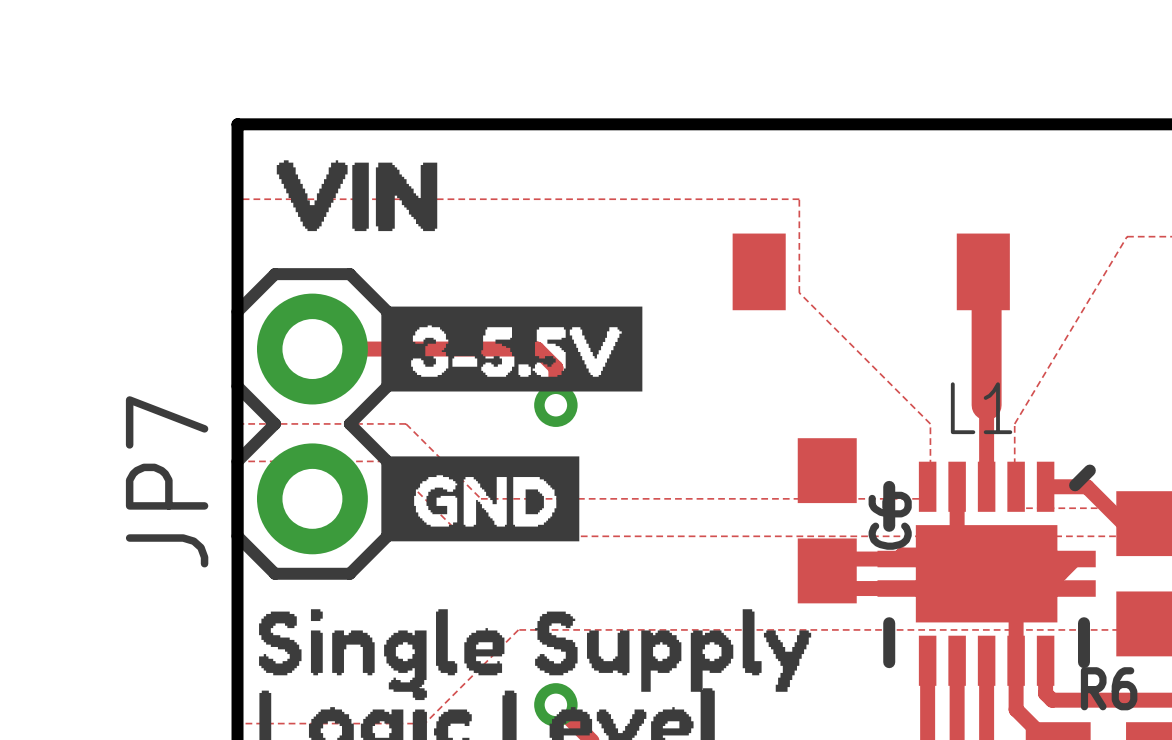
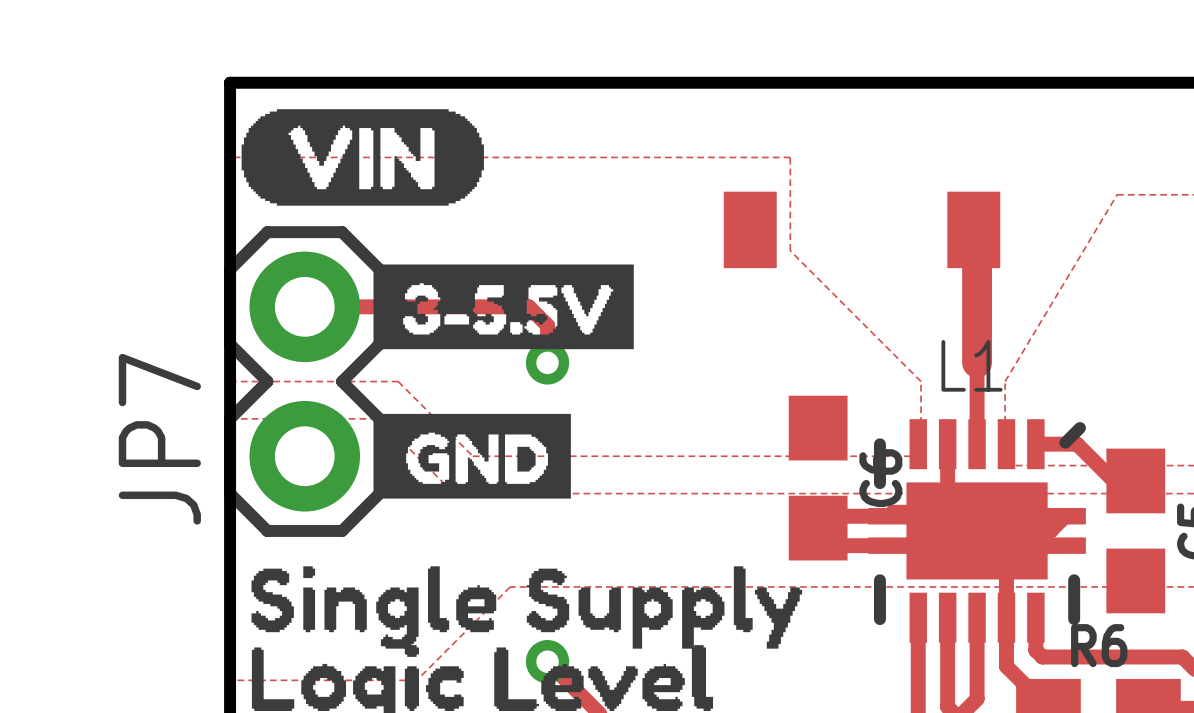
drawing shape: [276, 160, 438, 232] -> [241, 109, 484, 206]

